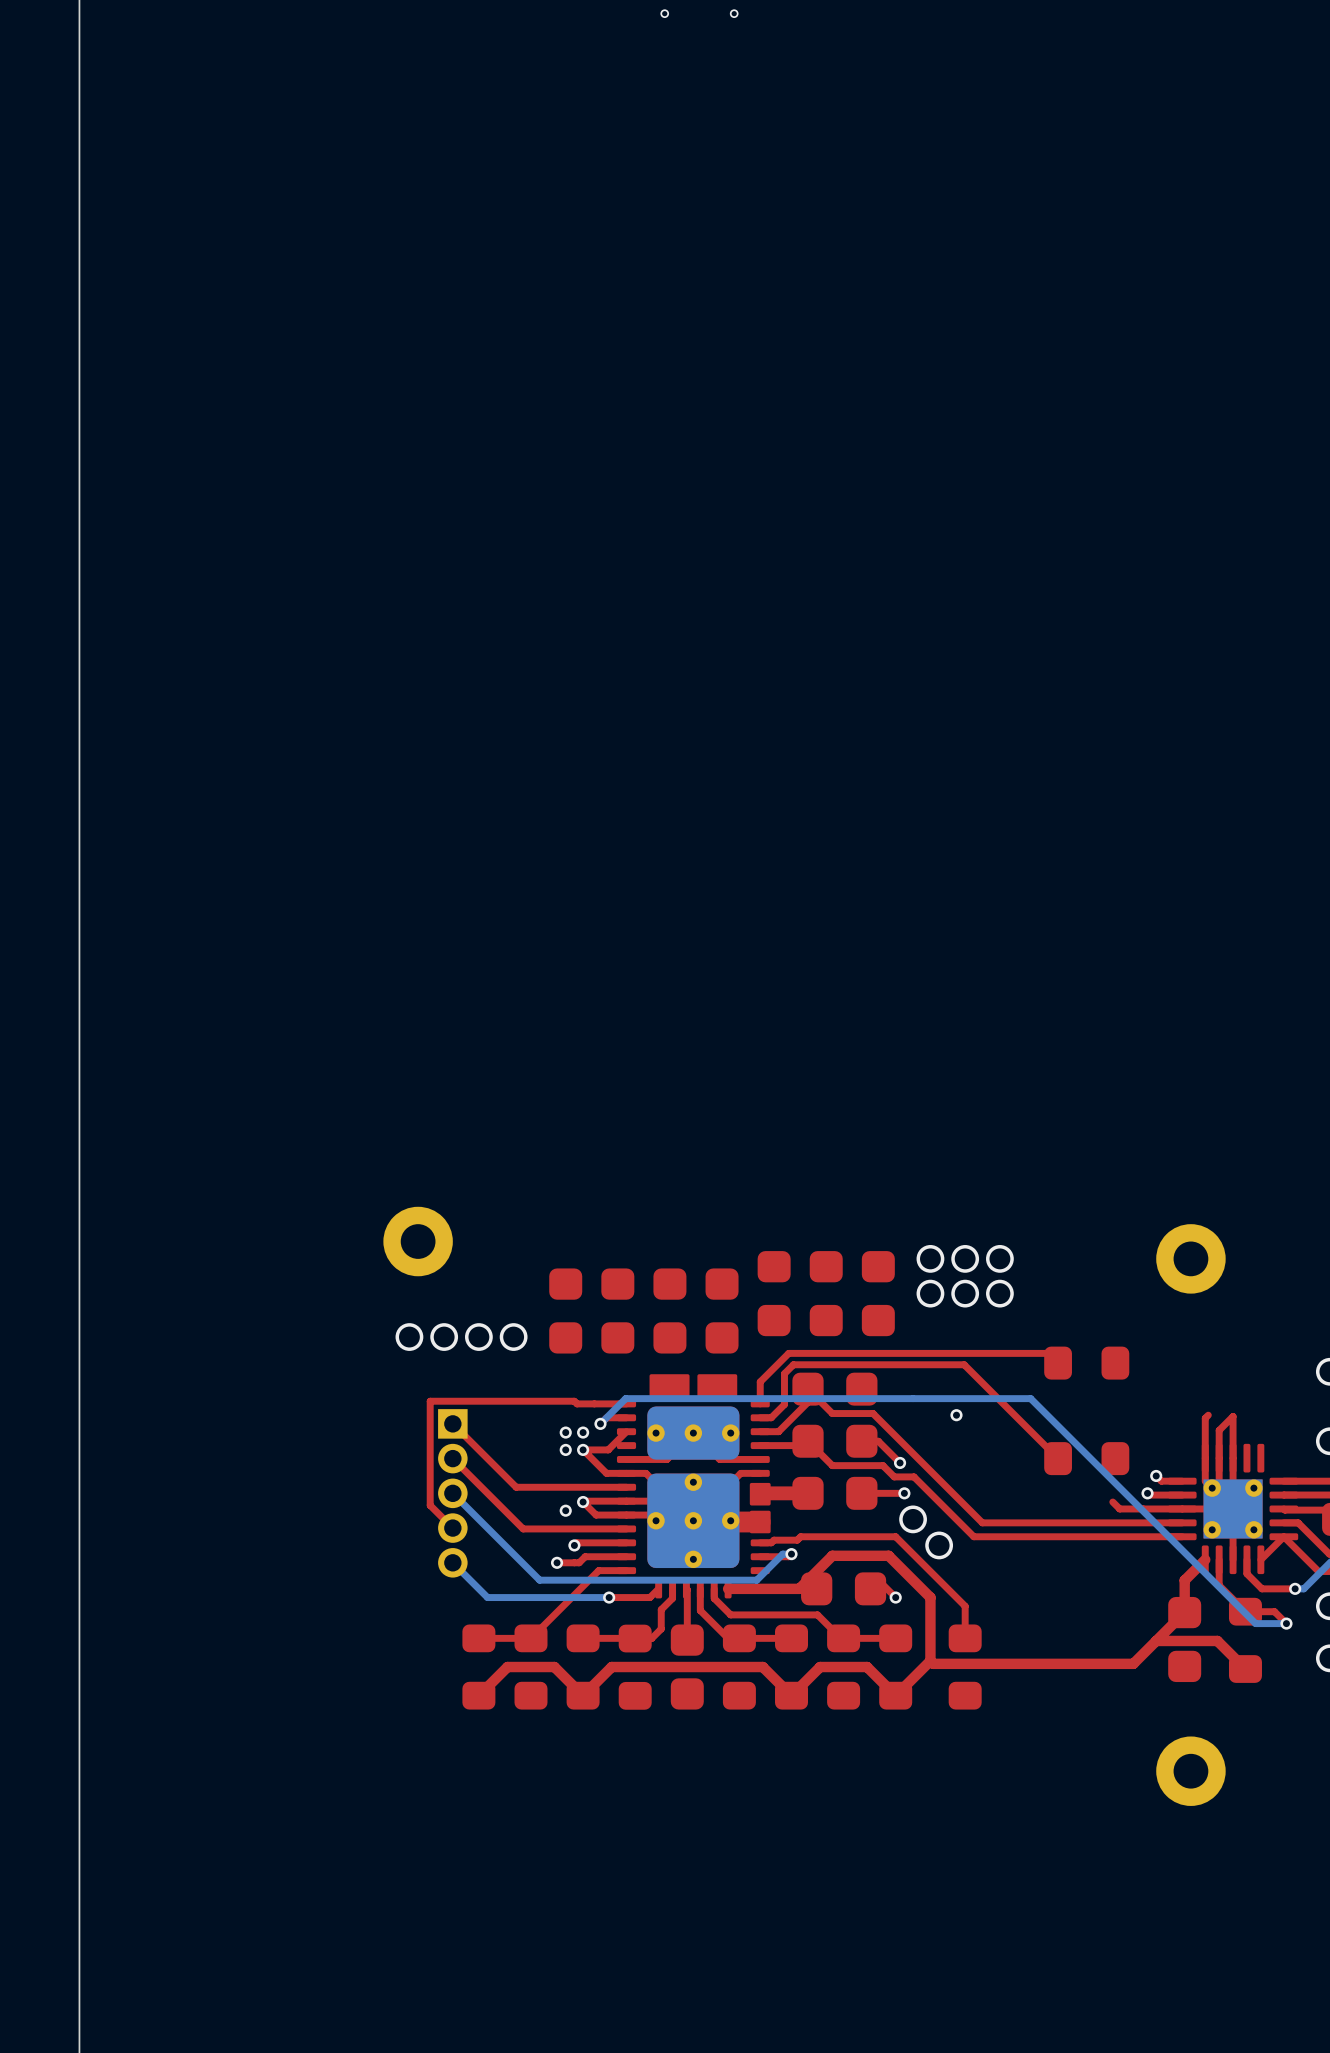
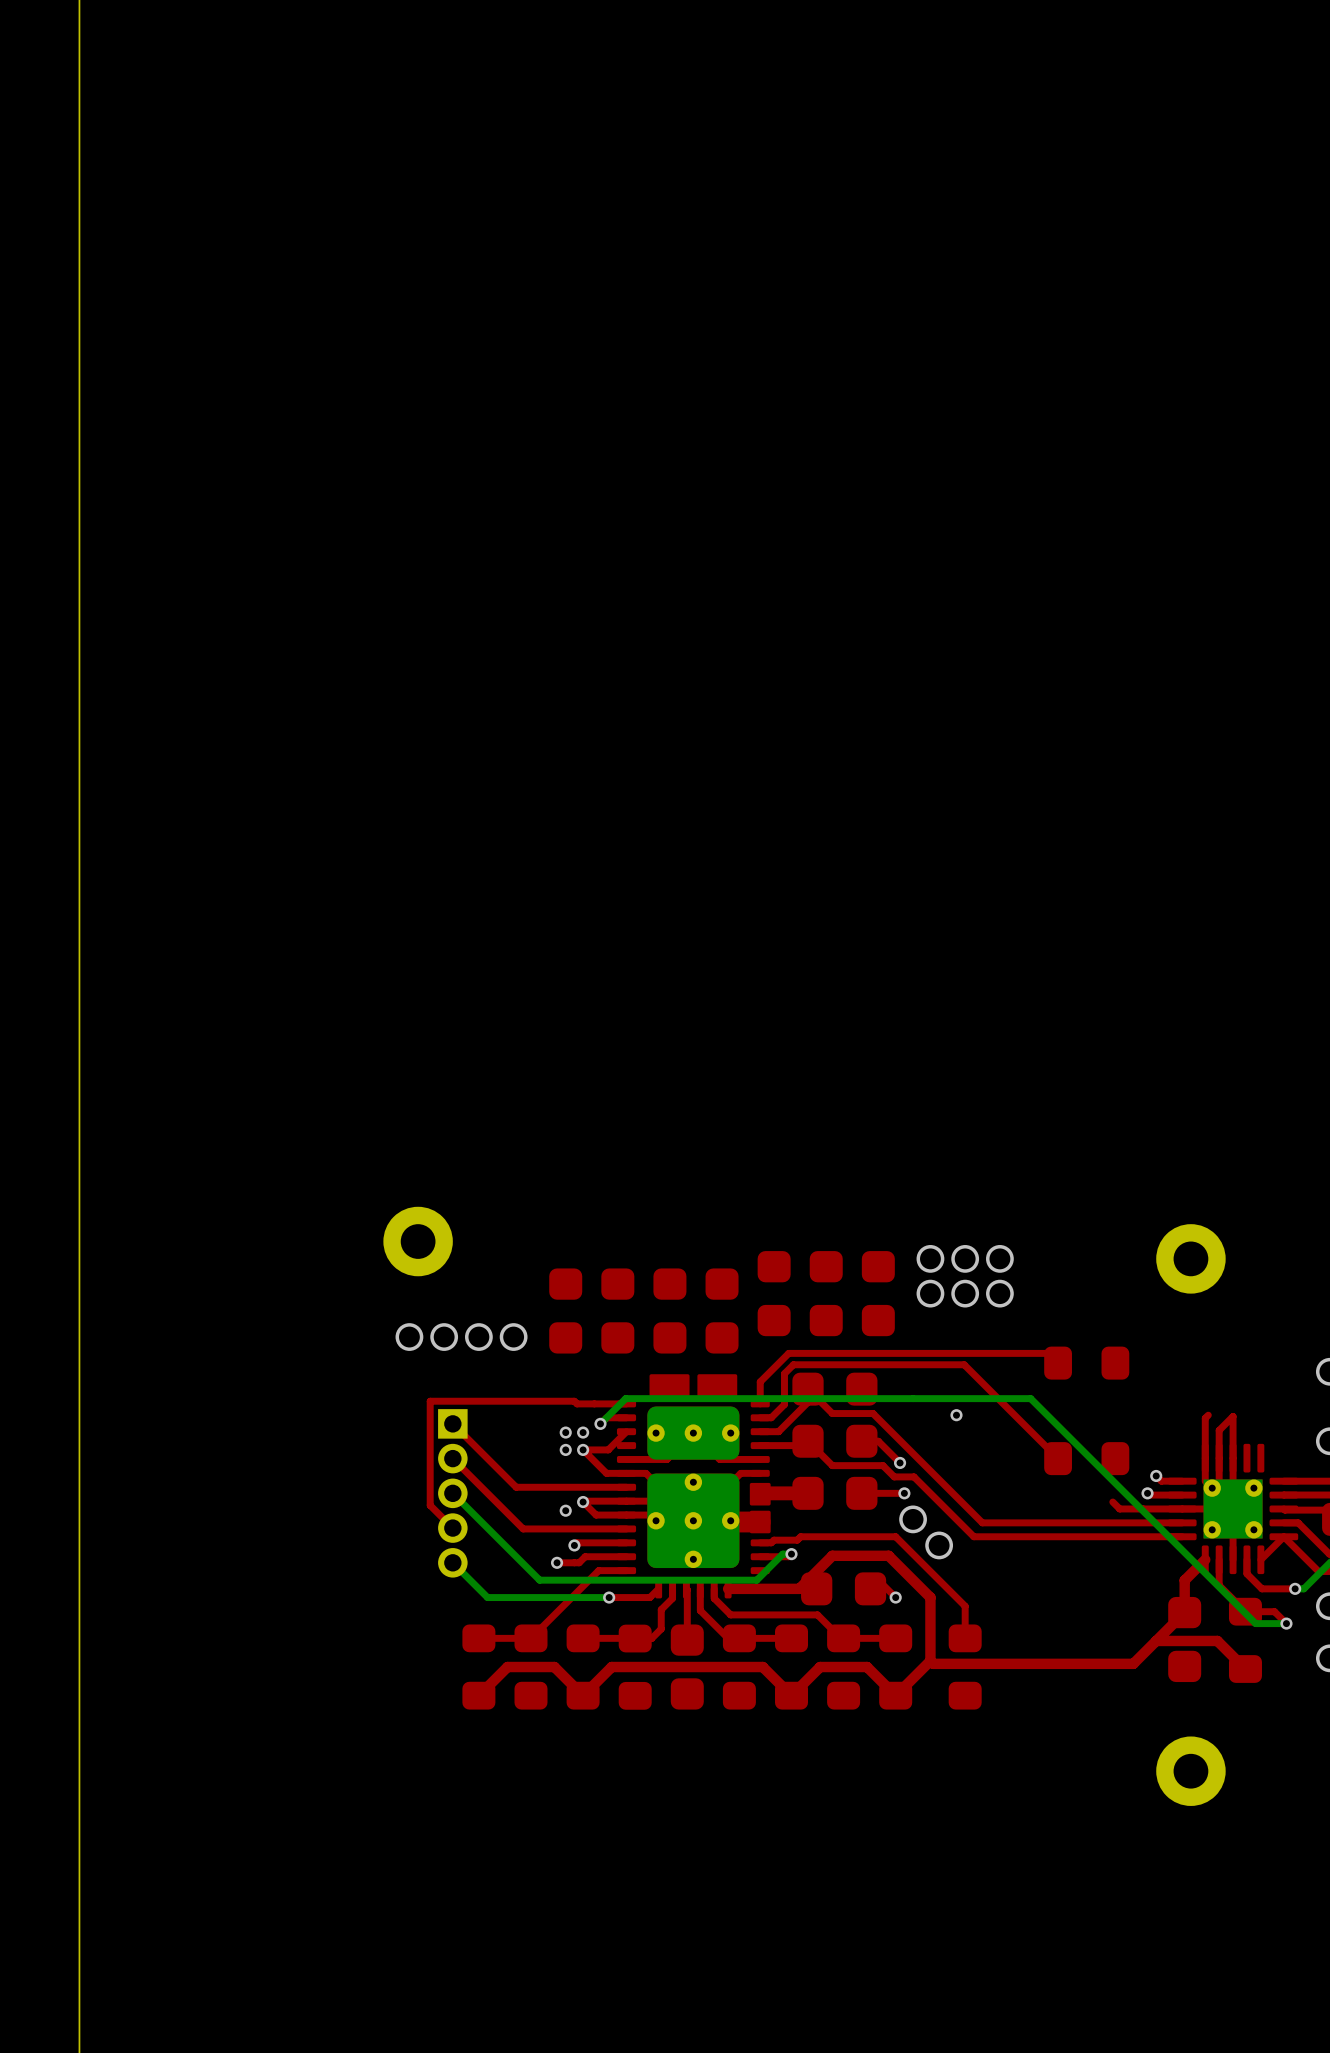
via: (664, 13) -> none
via: (734, 13) -> none

